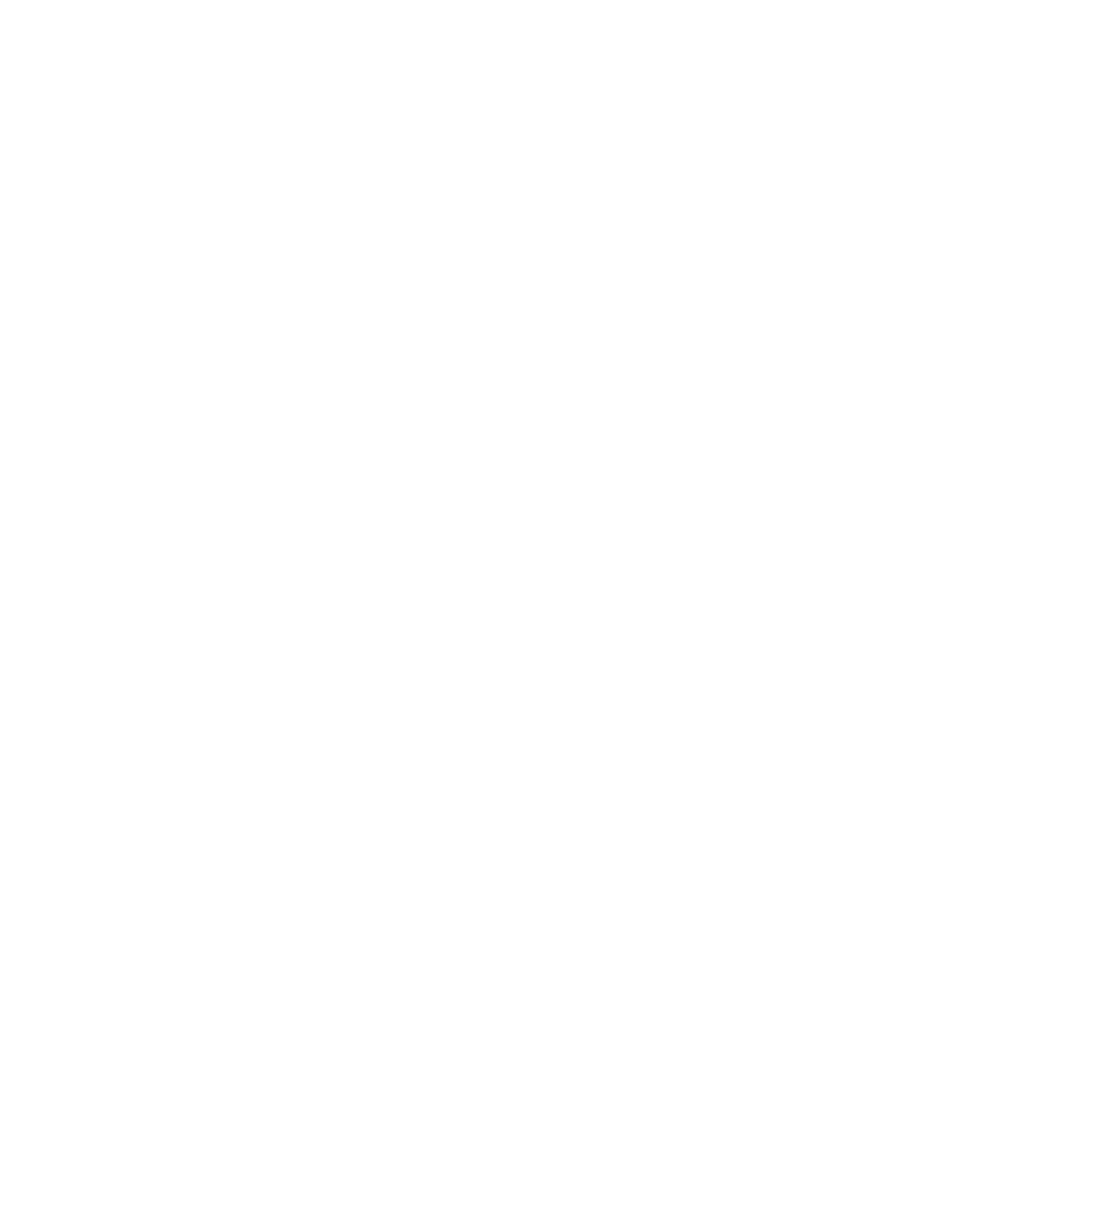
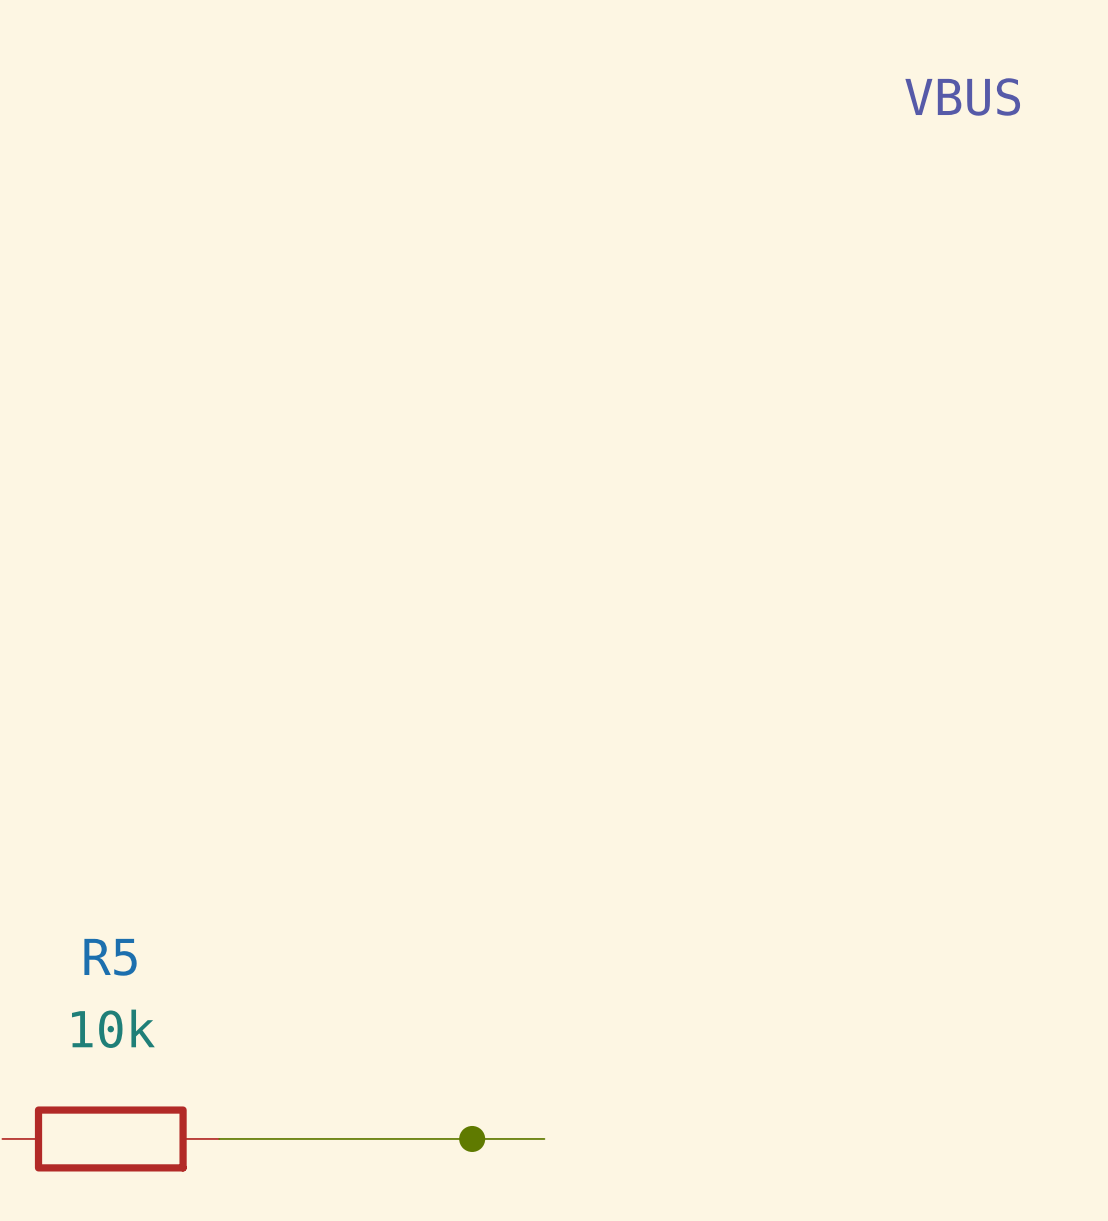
text: none -> VBUS (962, 96)
R5: none -> 10k (110, 1138)
wire: none -> (219, 1138) (544, 1138)
junction: none -> (472, 1138)

